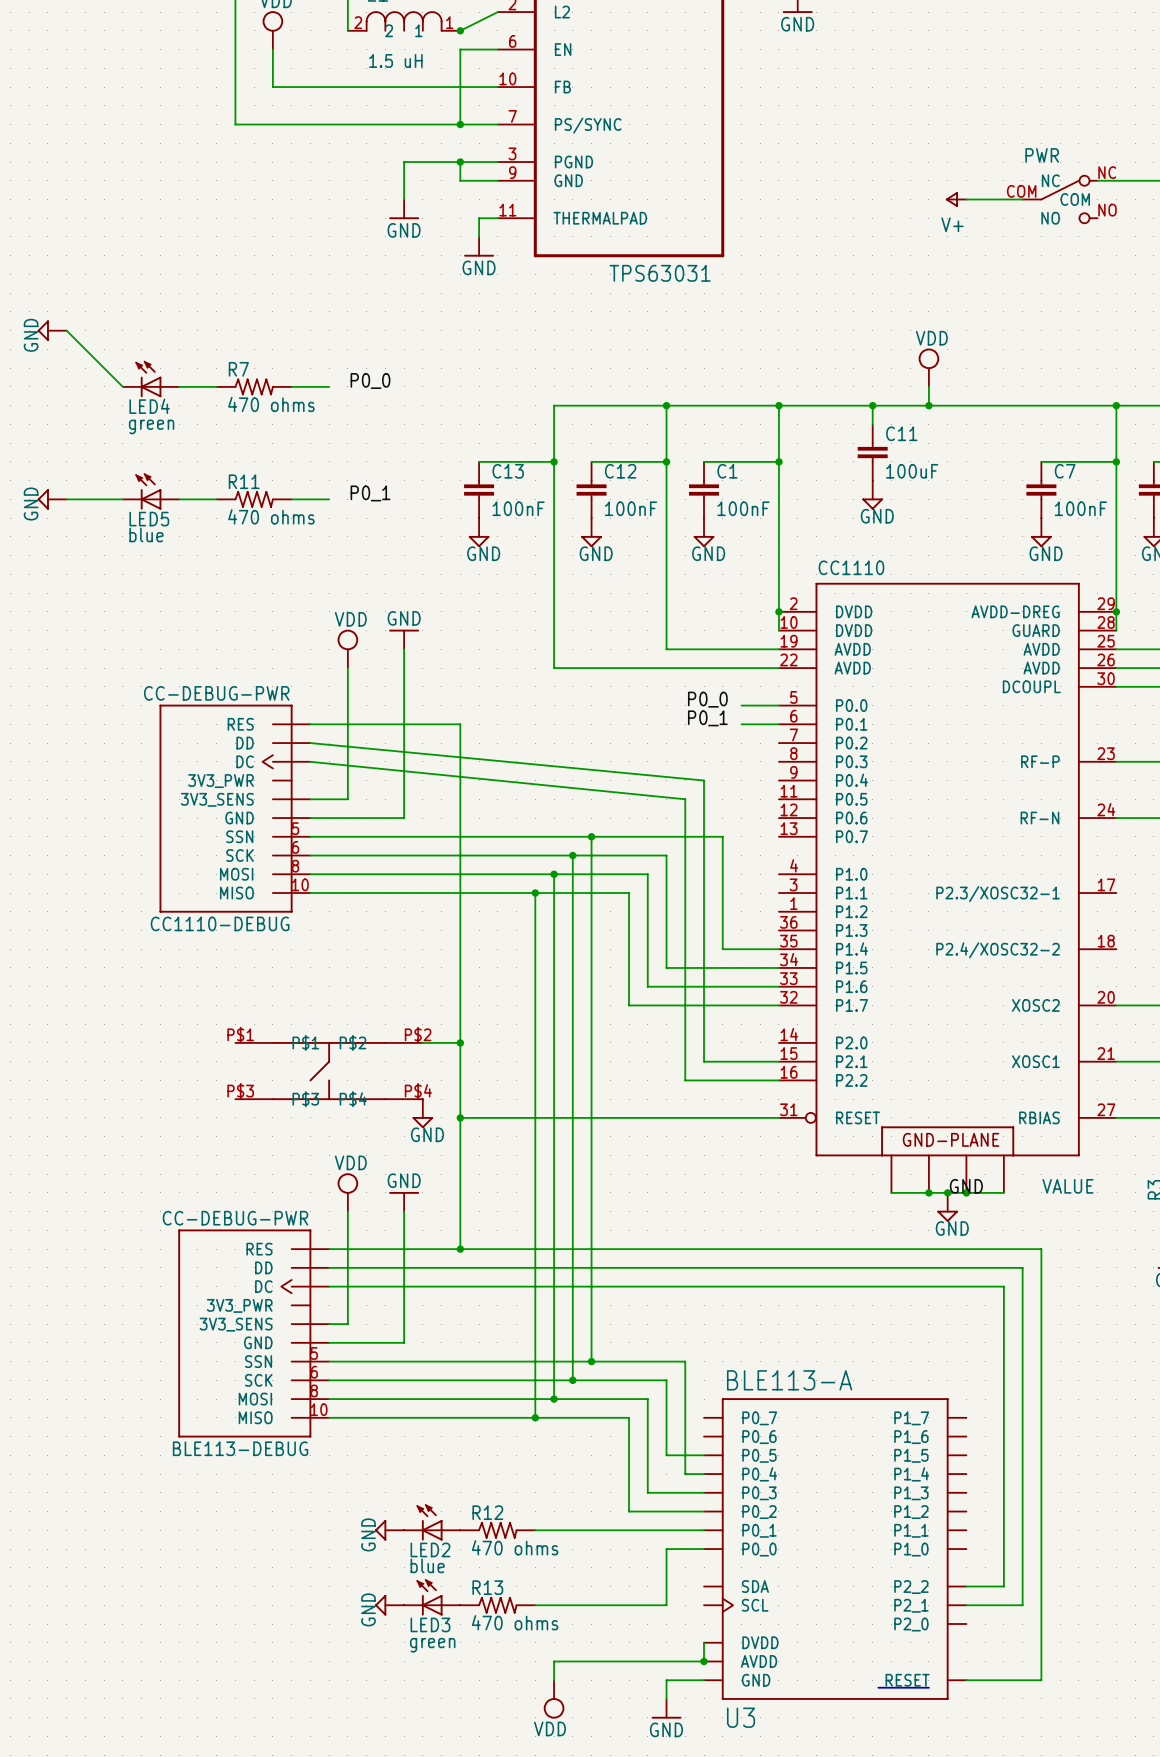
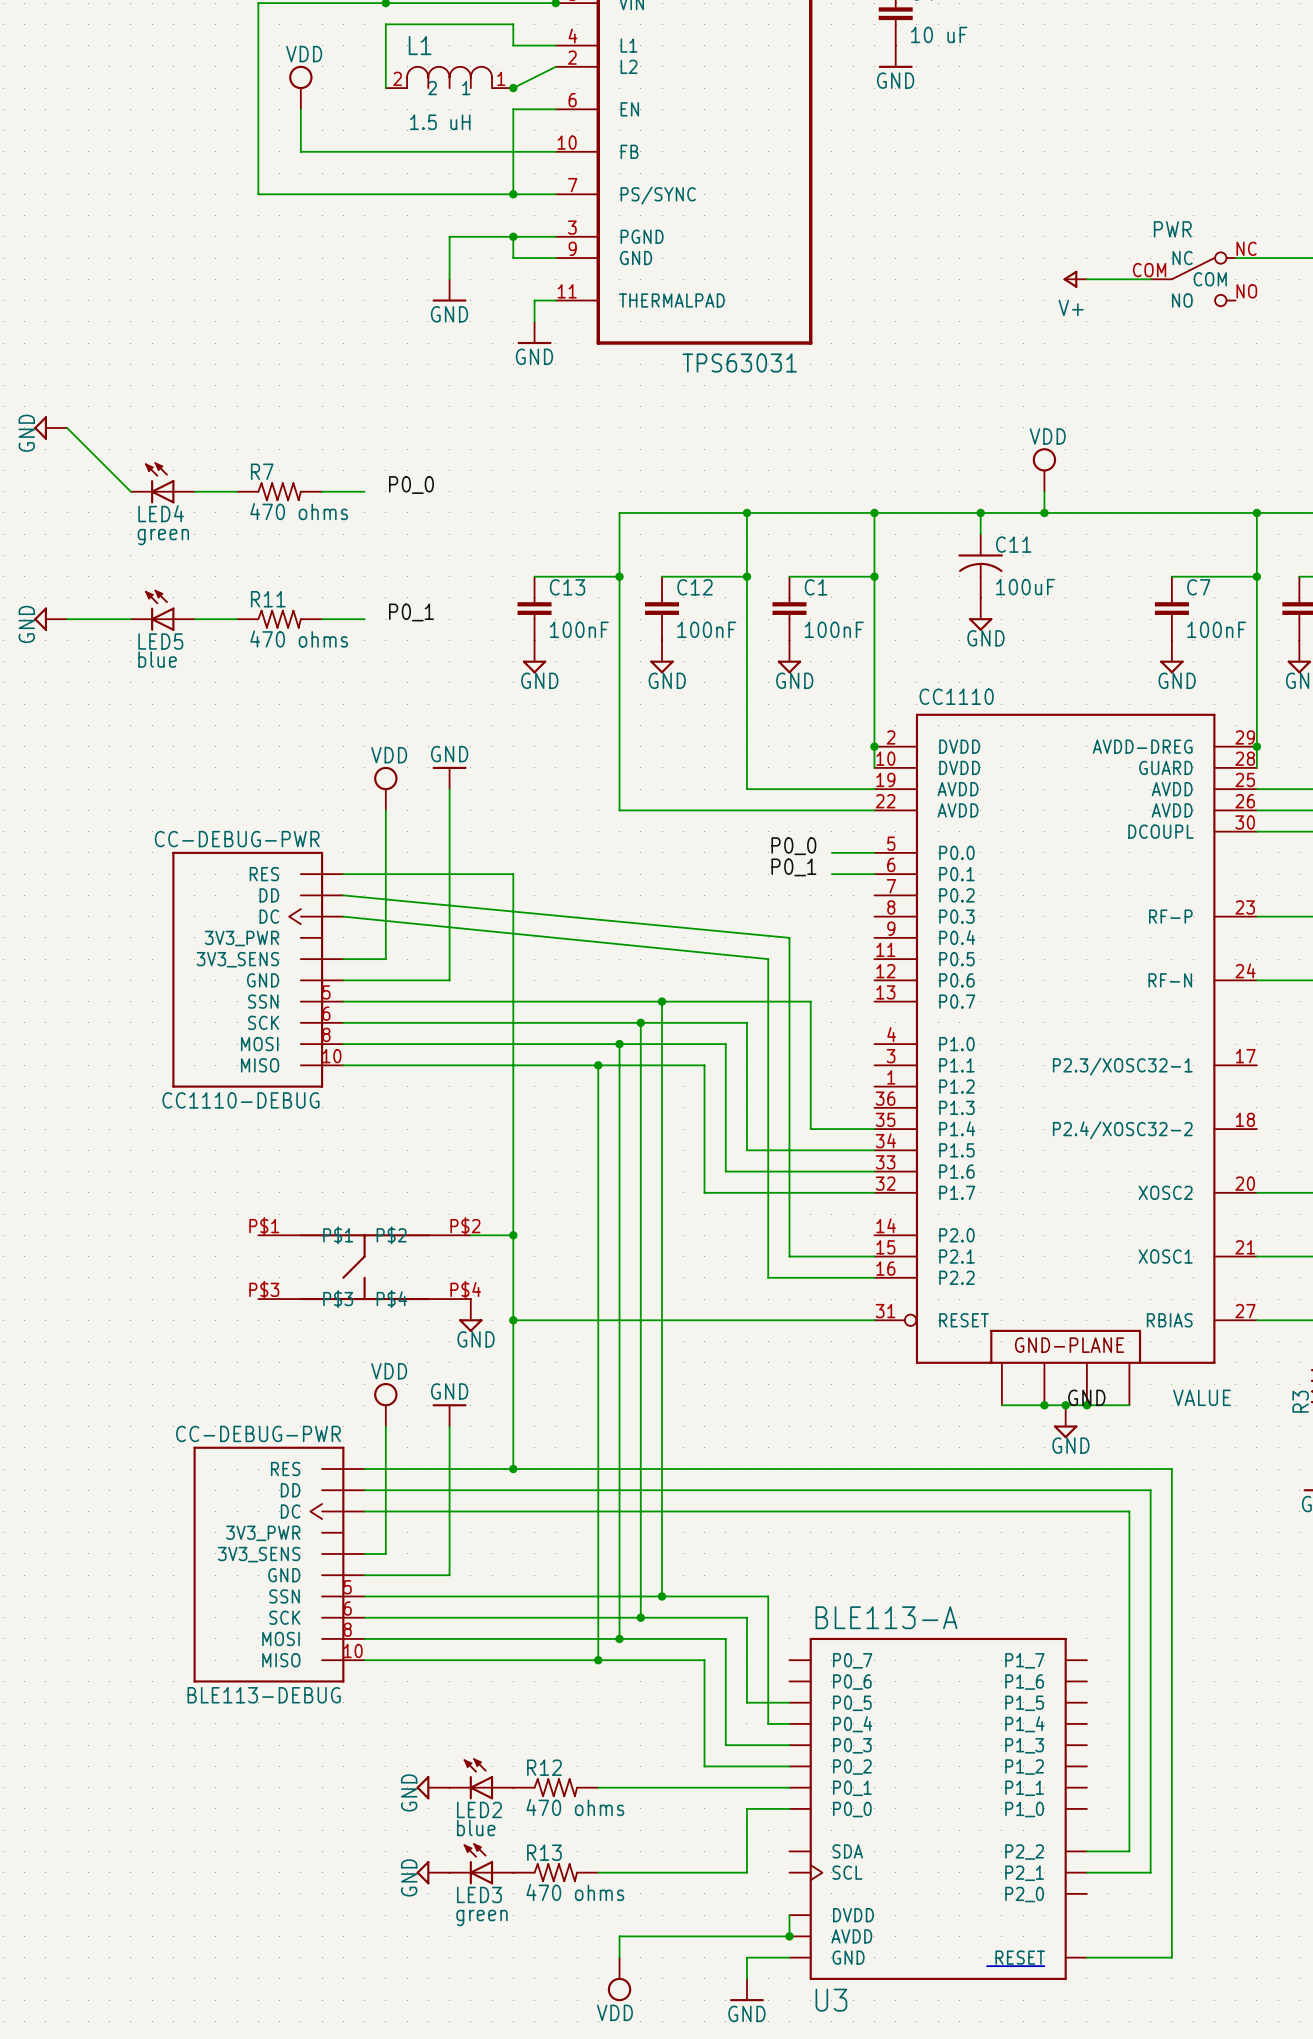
C11 symbol: [857, 424, 888, 481] -> [958, 534, 1003, 598]

